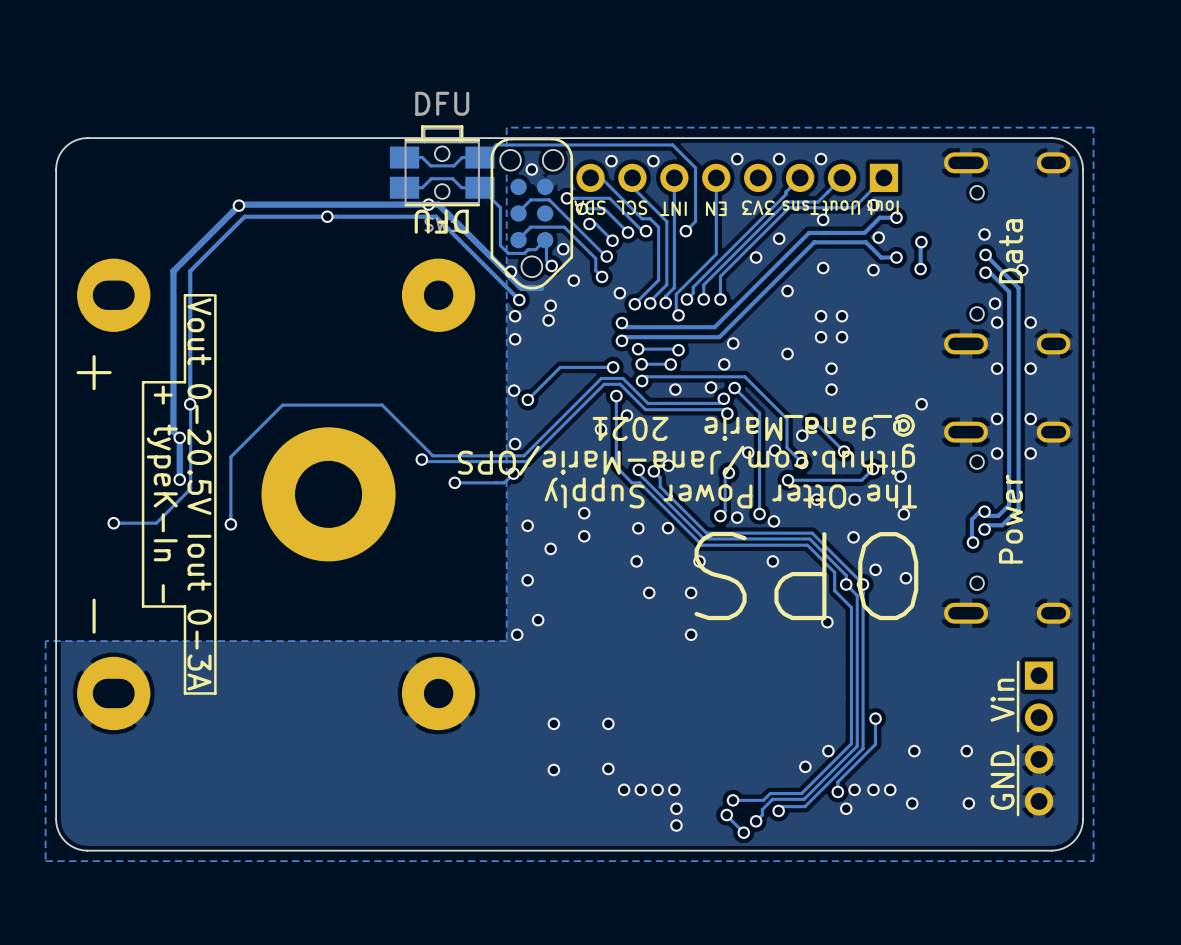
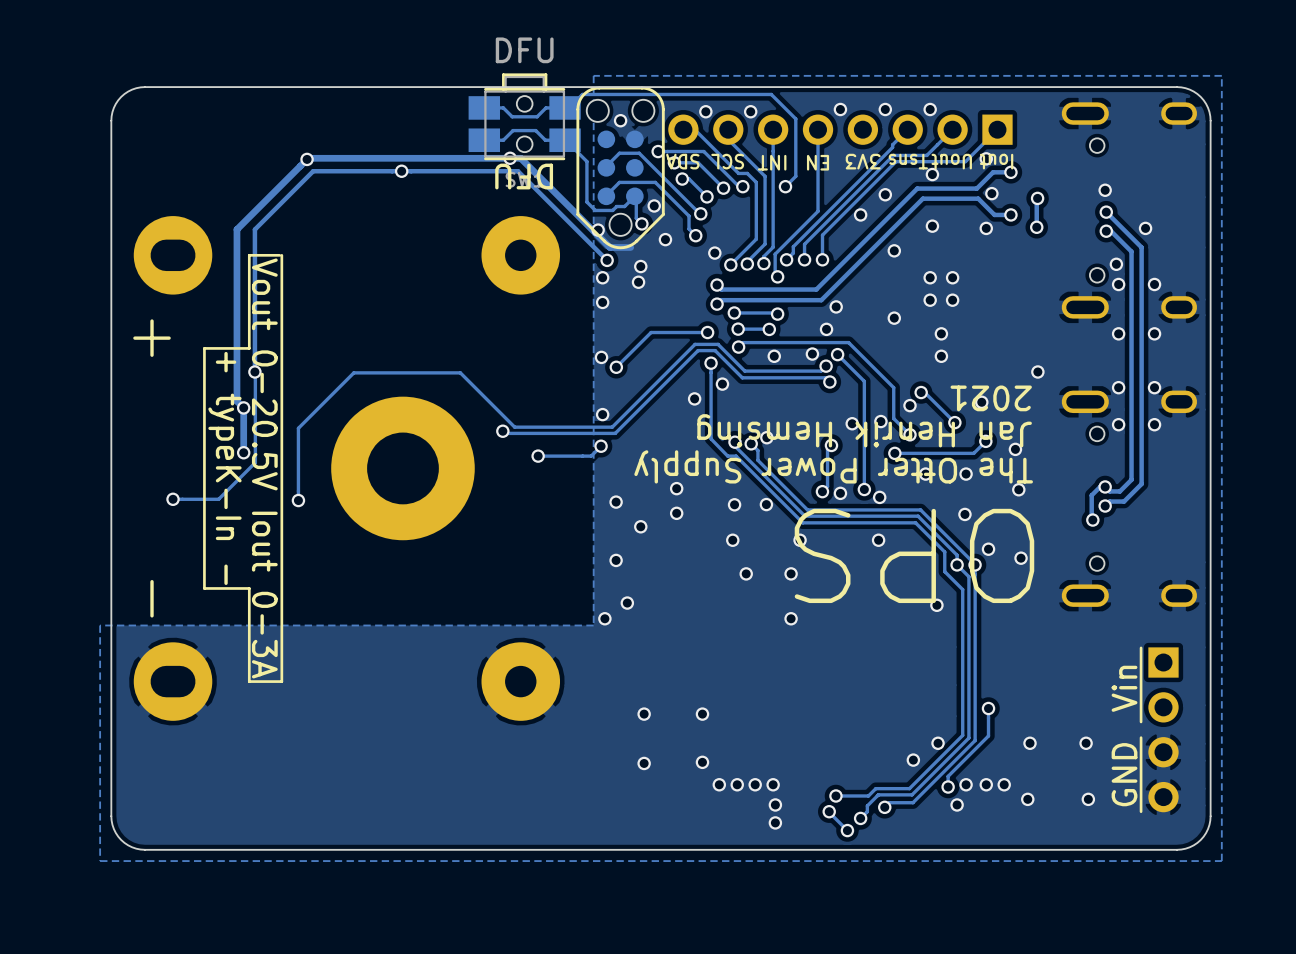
text: Data (1011, 251) -> none
text: @_Jana_Marie 2021 (753, 427) -> 2021 (991, 398)
text: github.com/Jana-Marie/OPS (686, 459) -> Jan Henrik Hemsing (864, 430)
text: Power (1011, 519) -> none

